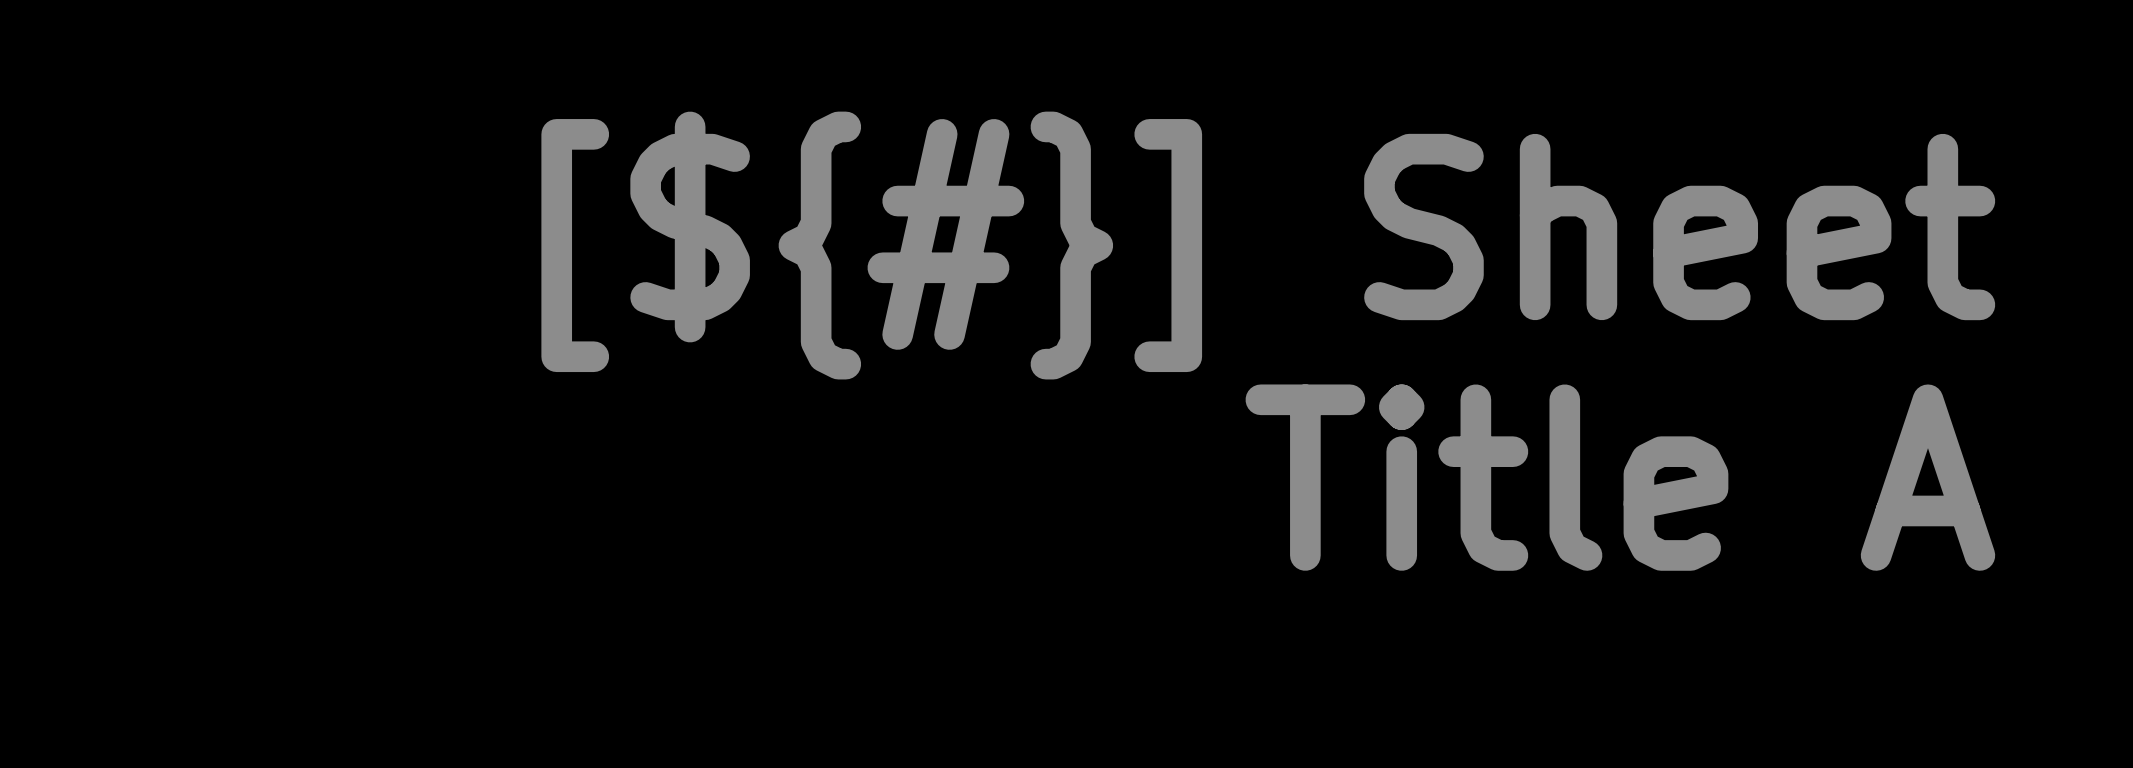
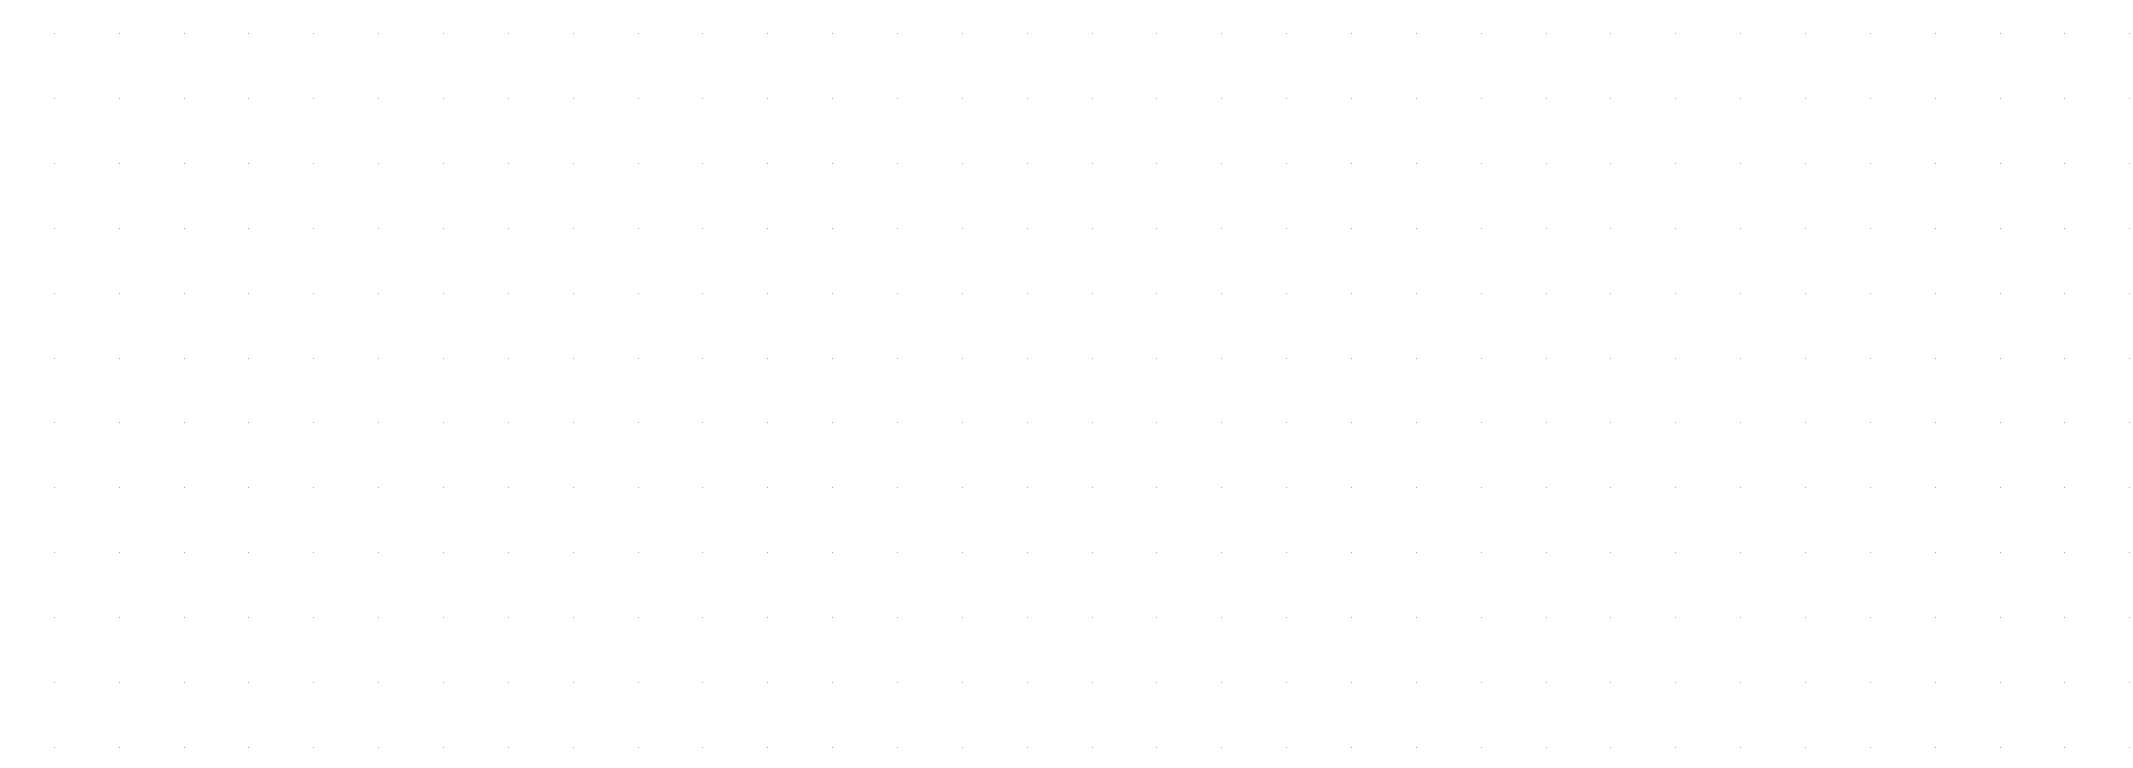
text: [${#}] Sheet (1268, 245) -> none
text: Title A (1620, 477) -> none

